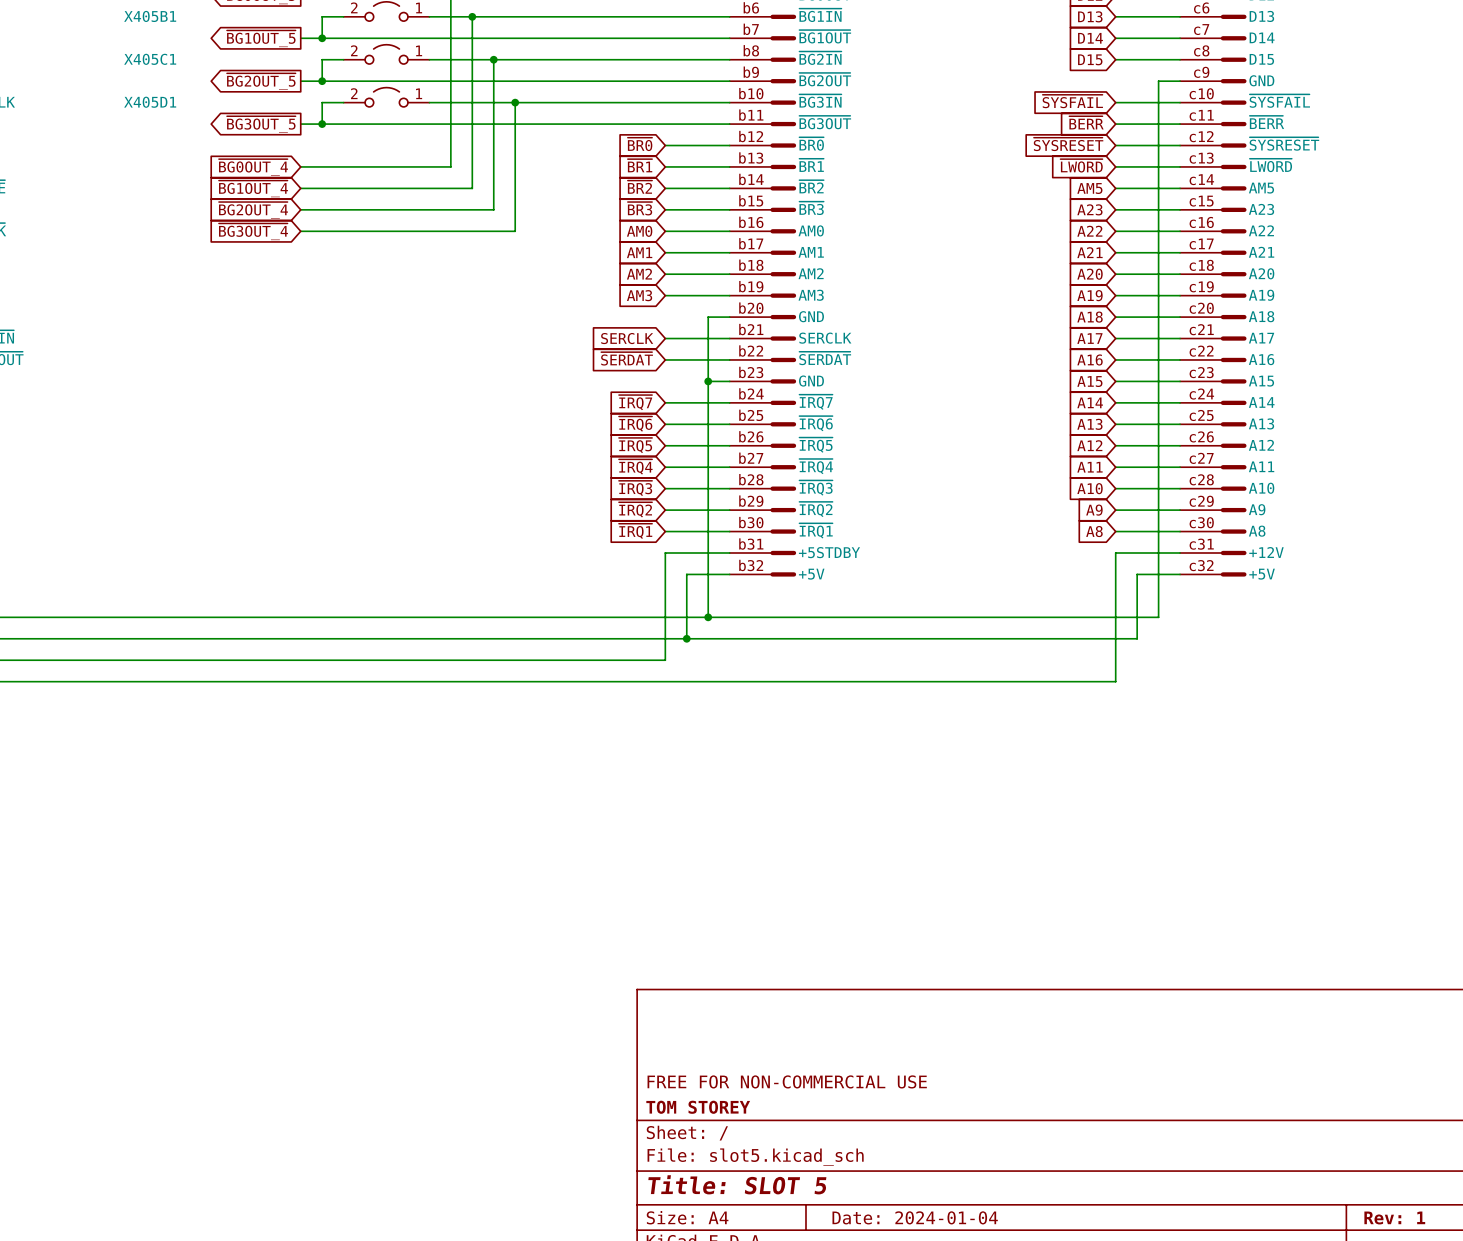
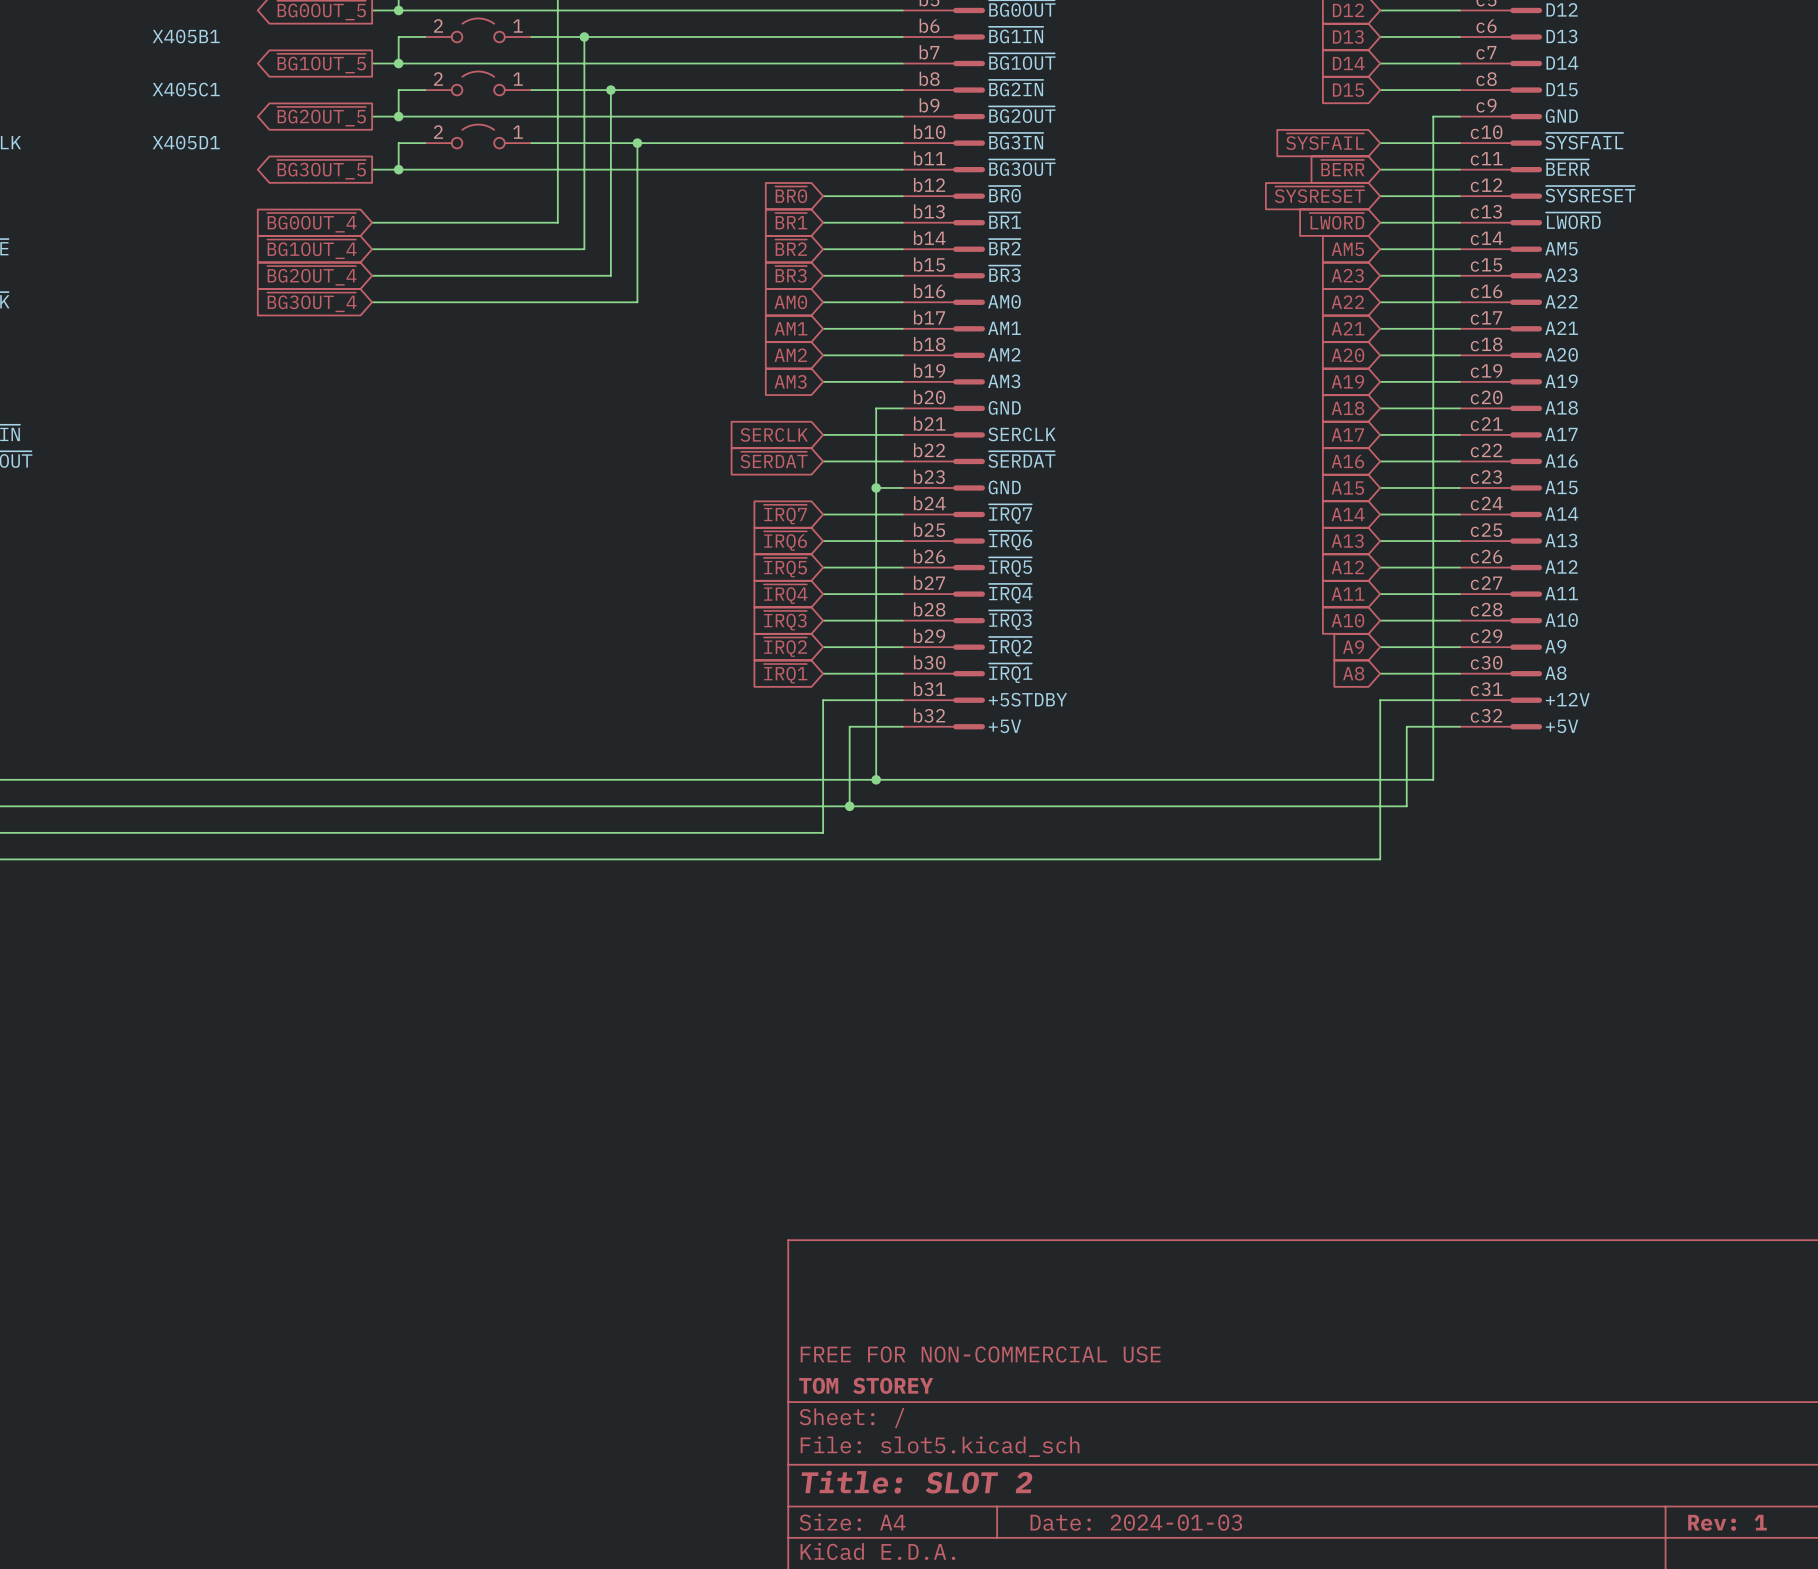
title block: Title: SLOT 5 (737, 1184) -> Title: SLOT 2 (916, 1482)
title block: Date: 2024-01-04 (915, 1217) -> Date: 2024-01-03 (1136, 1522)

